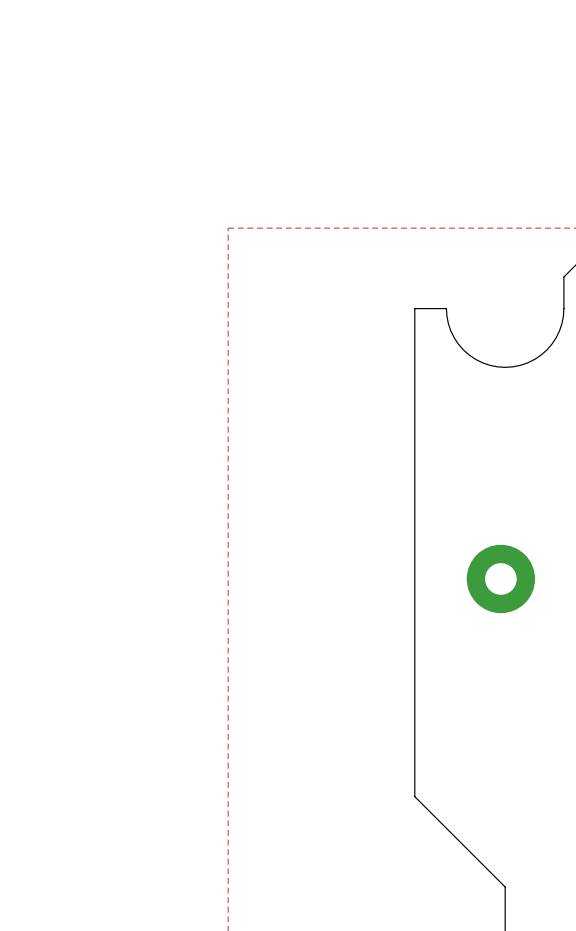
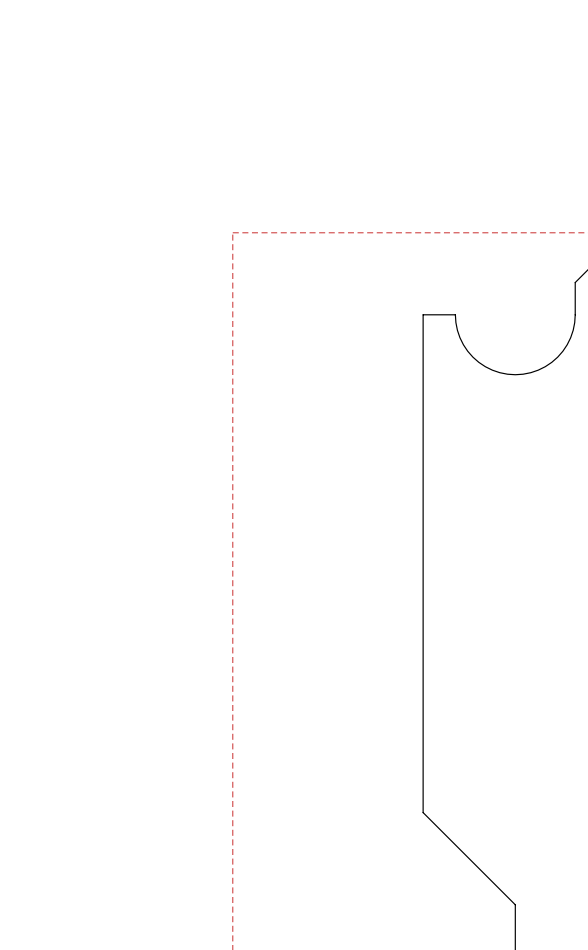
via: (500, 578) -> none

